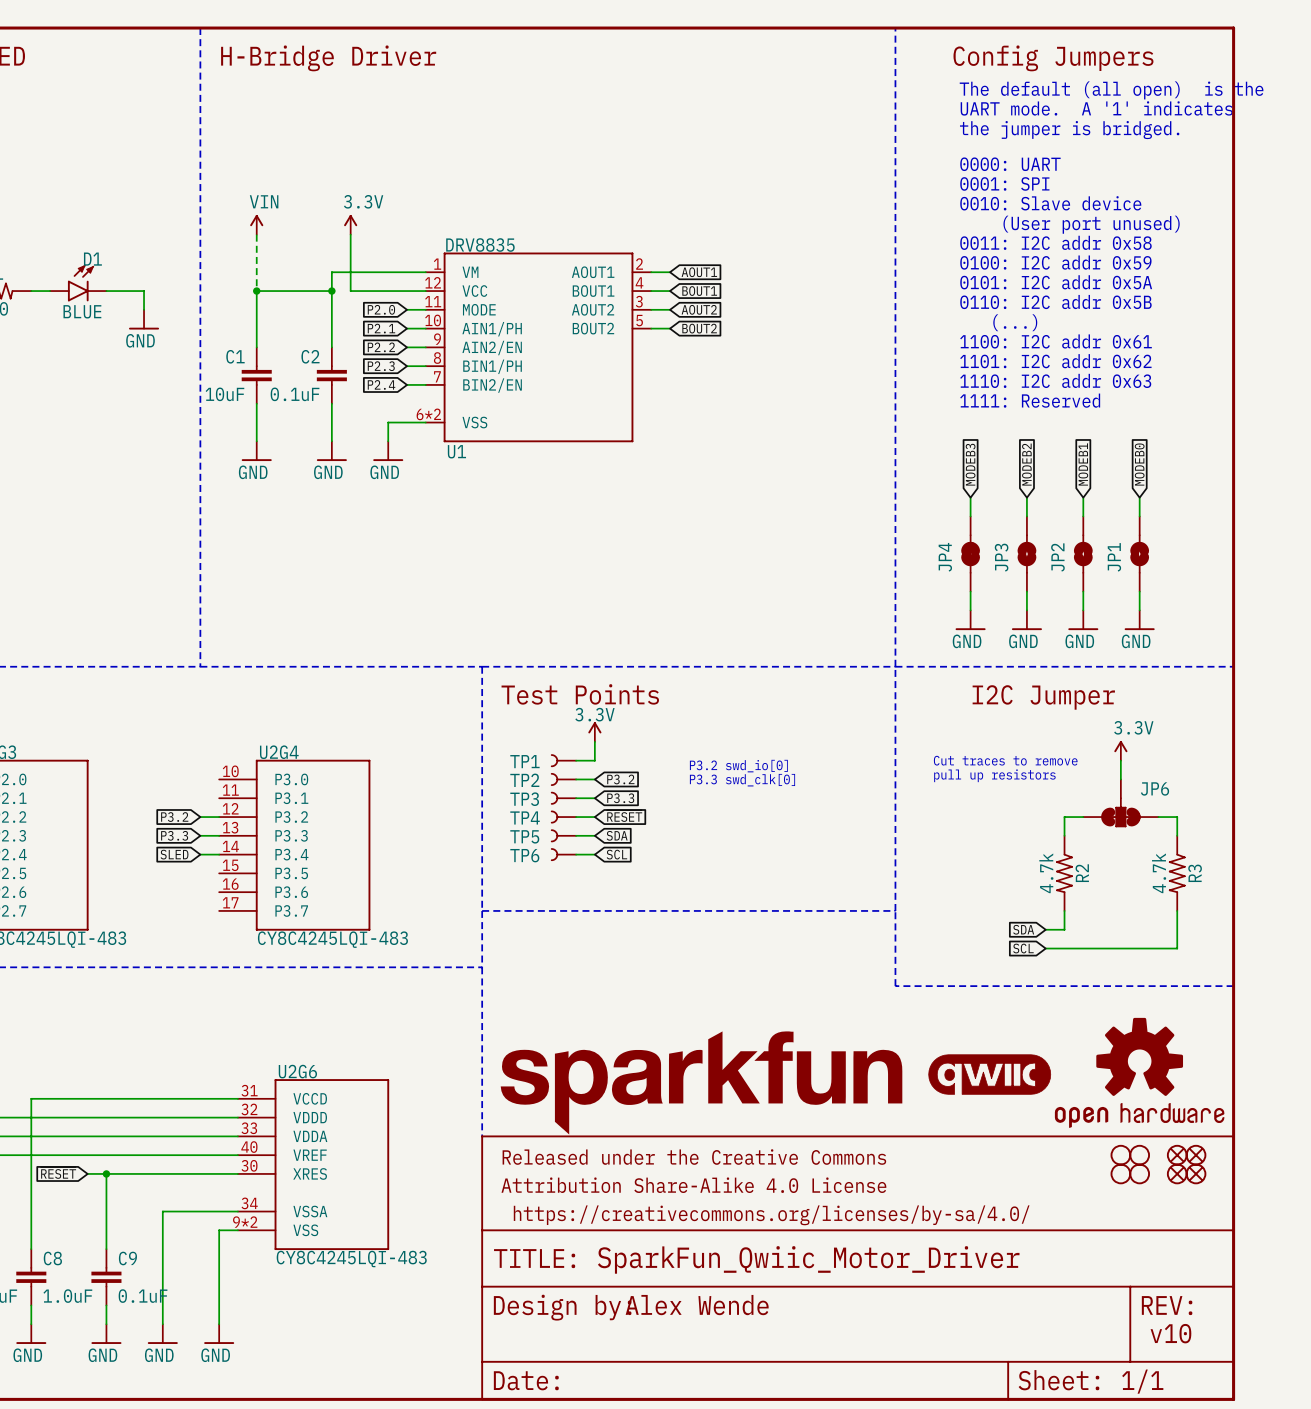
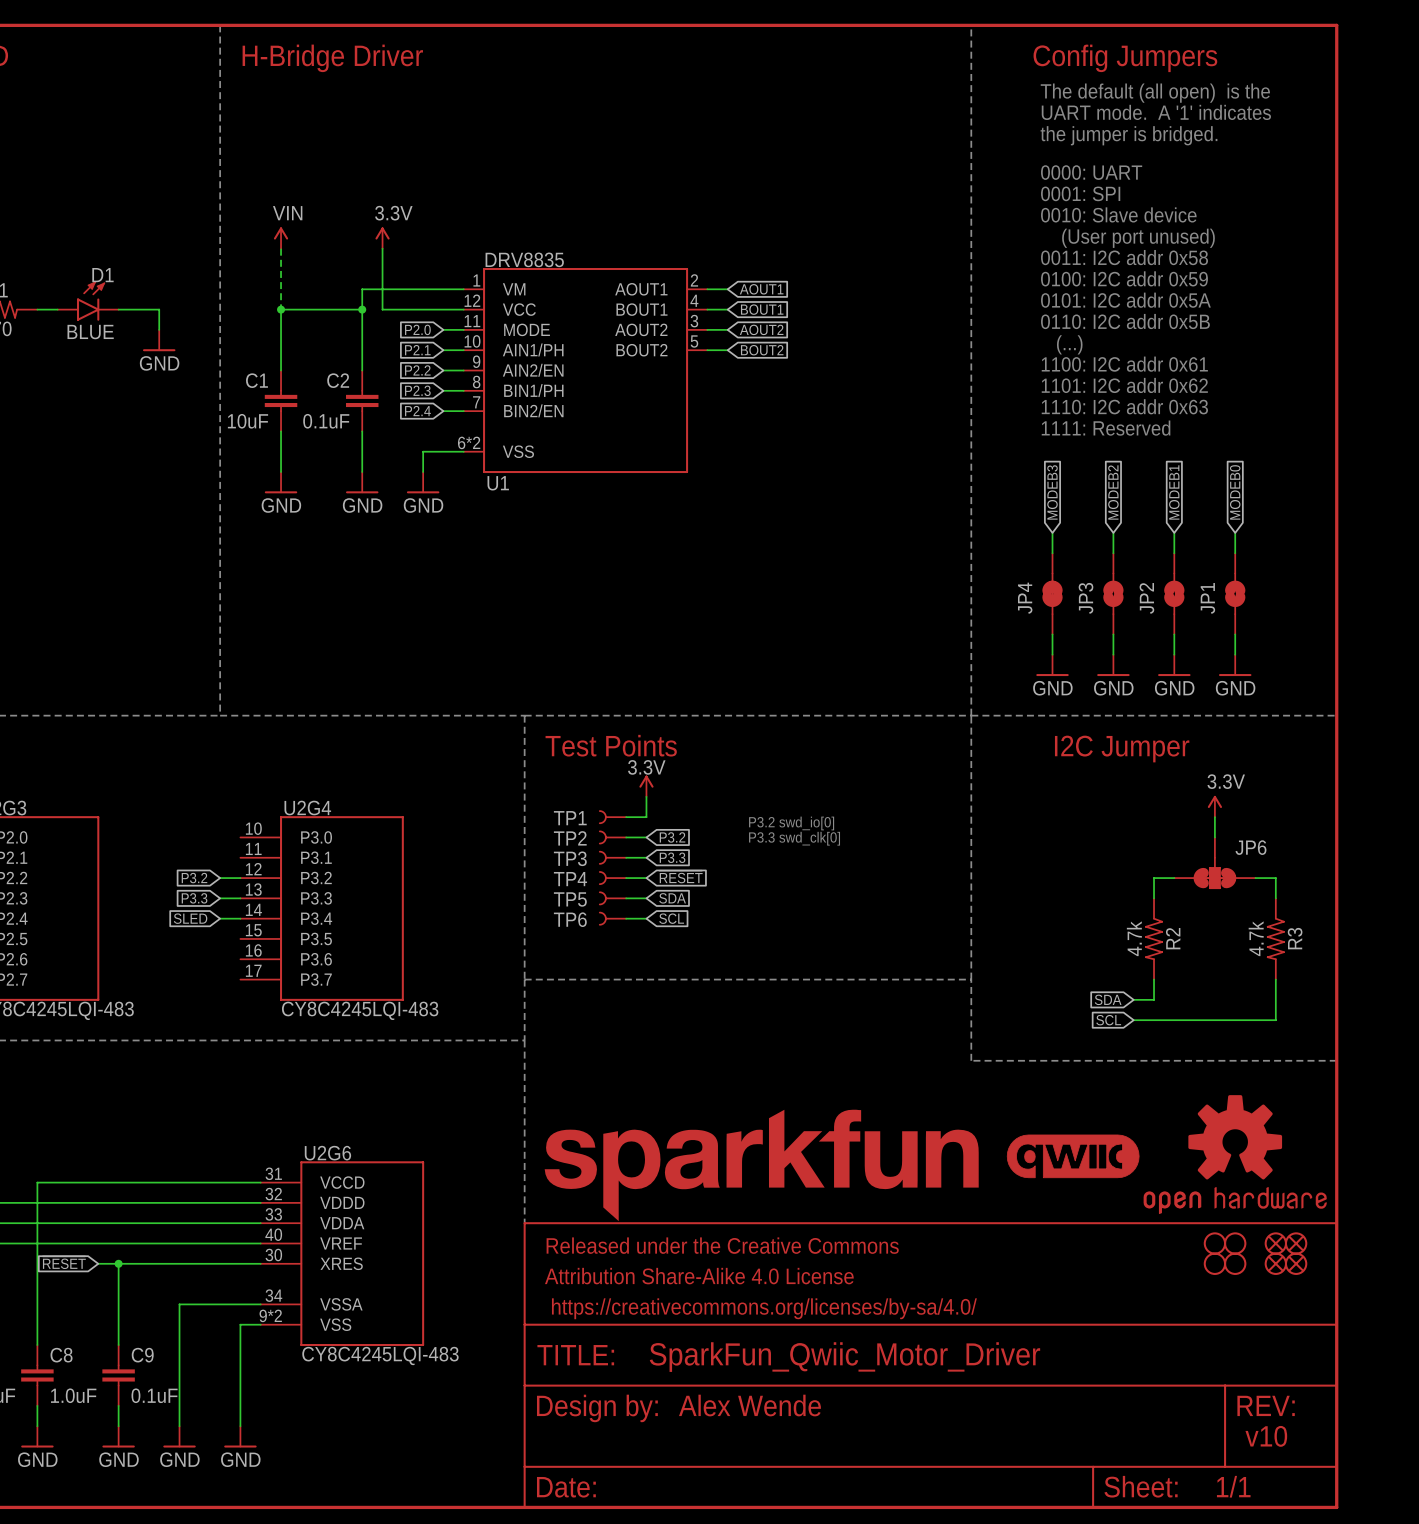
text: Cut traces to remove (1005, 760) -> none
text: pull up resistors (994, 775) -> none

